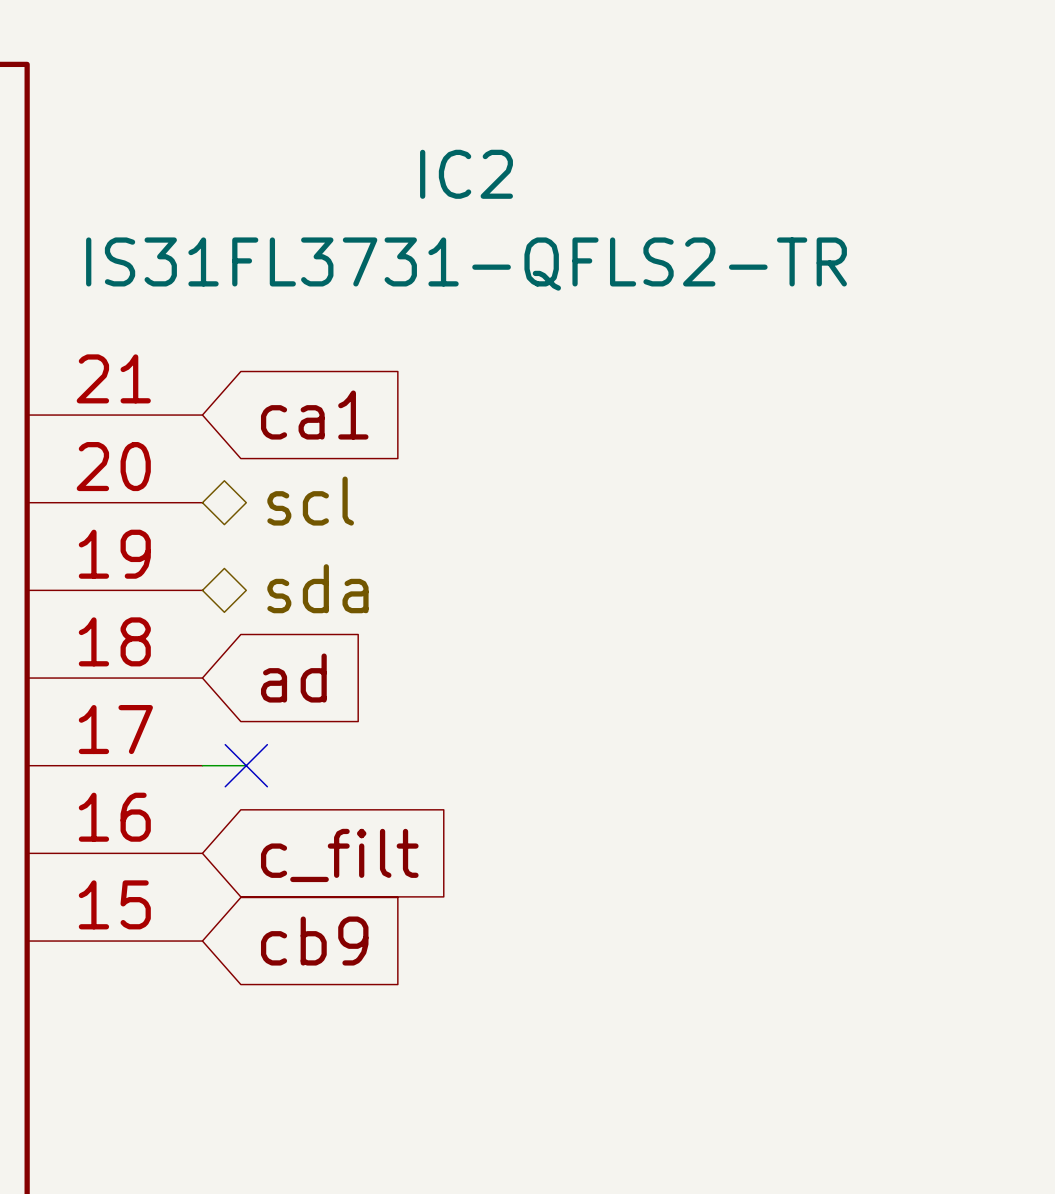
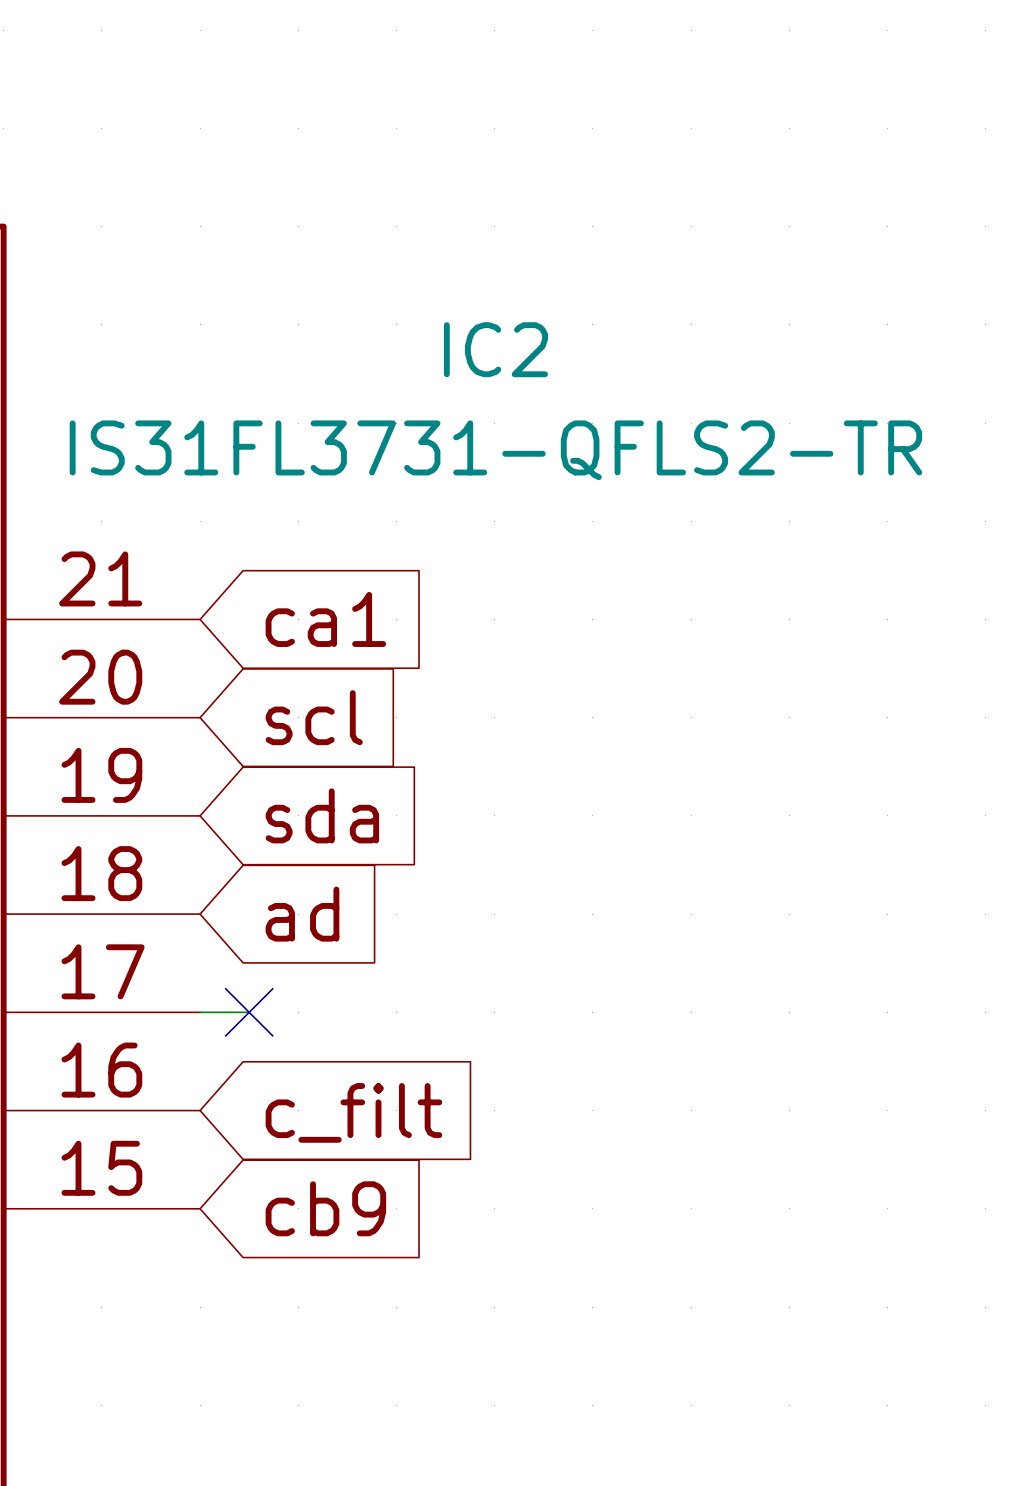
hierarchical label: scl (310, 501) -> none
global label: none -> scl (314, 717)
hierarchical label: sda (317, 588) -> none
global label: none -> sda (322, 815)

